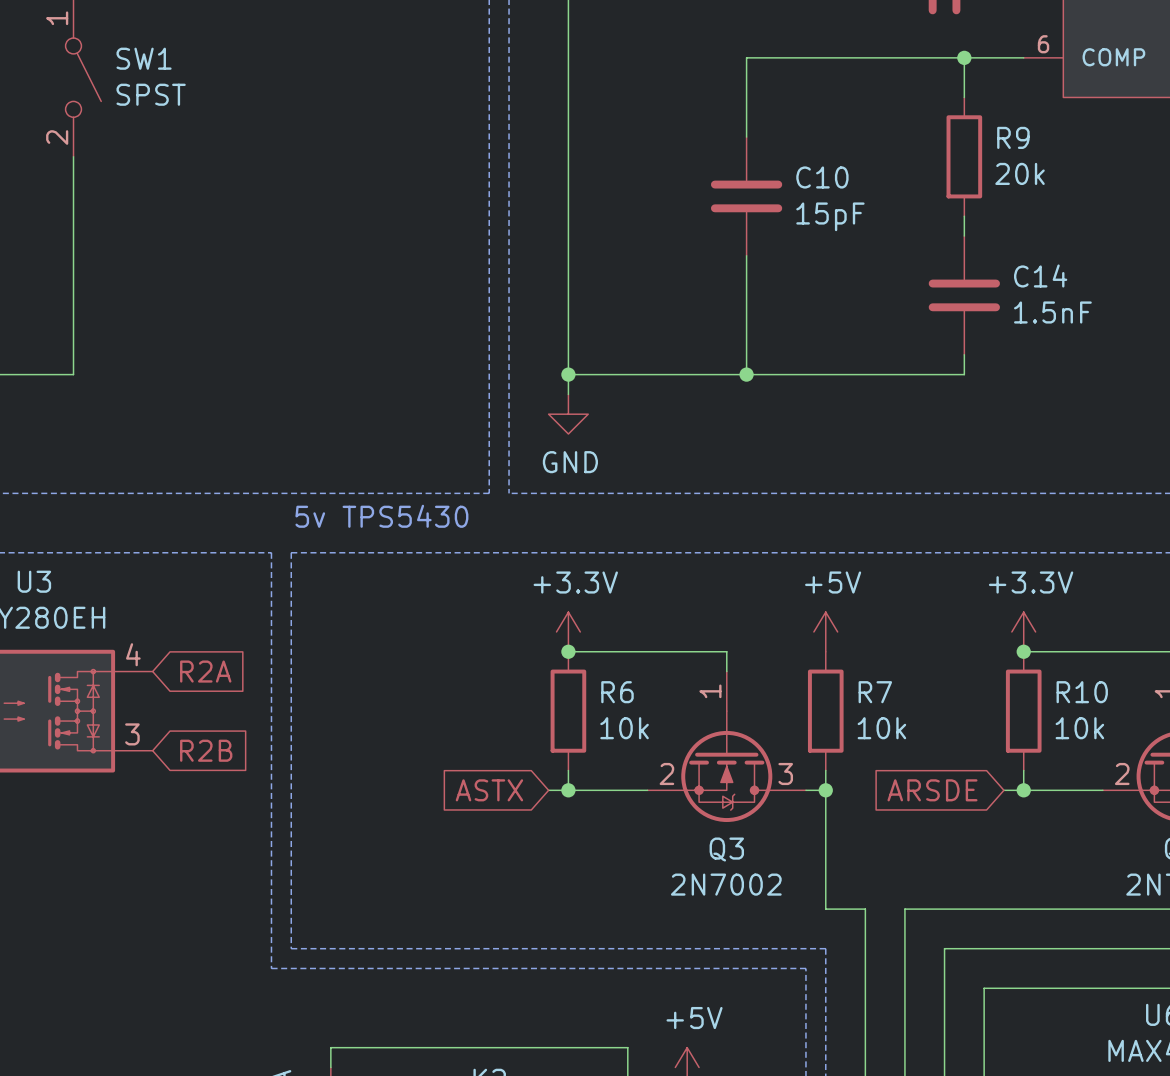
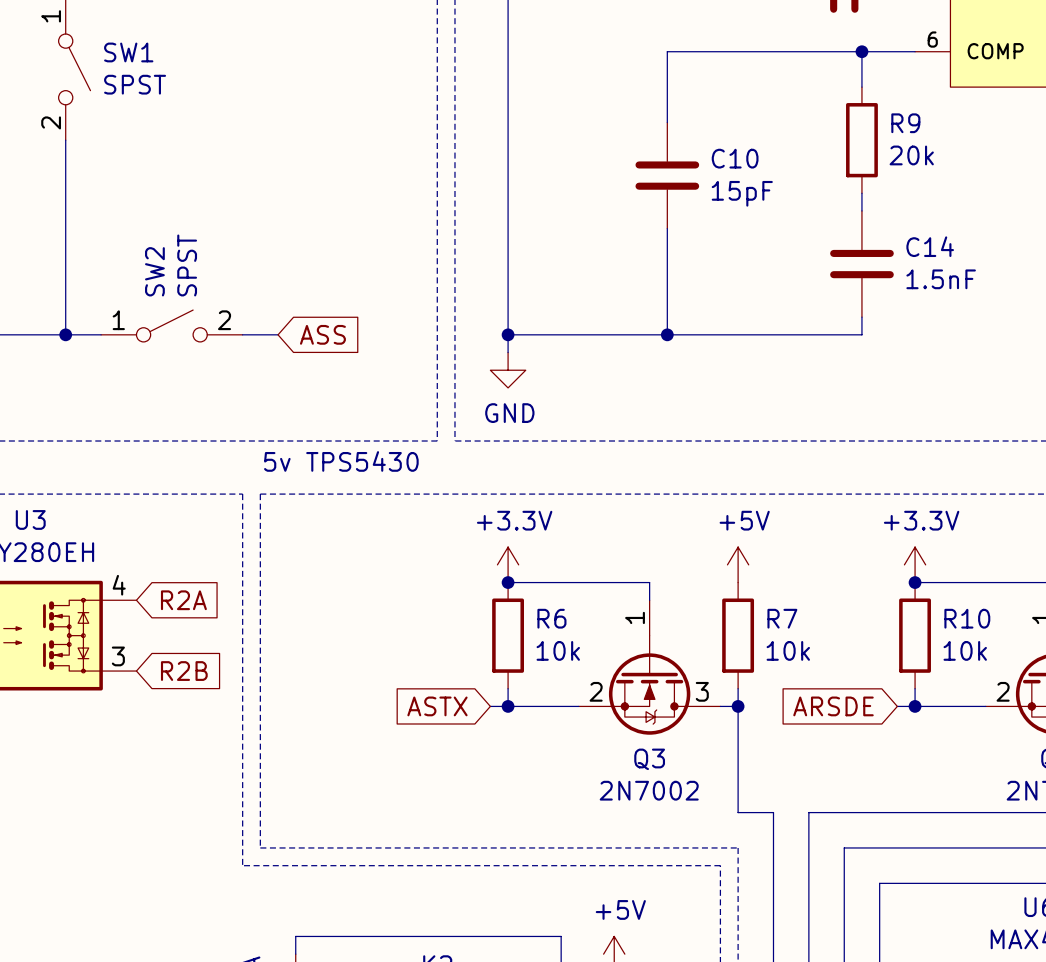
SW2: none -> SPST (171, 325)
wire: none -> (65, 334) (101, 334)
junction: none -> (65, 334)
wire: none -> (242, 334) (278, 334)
global label: none -> ASS (322, 334)

